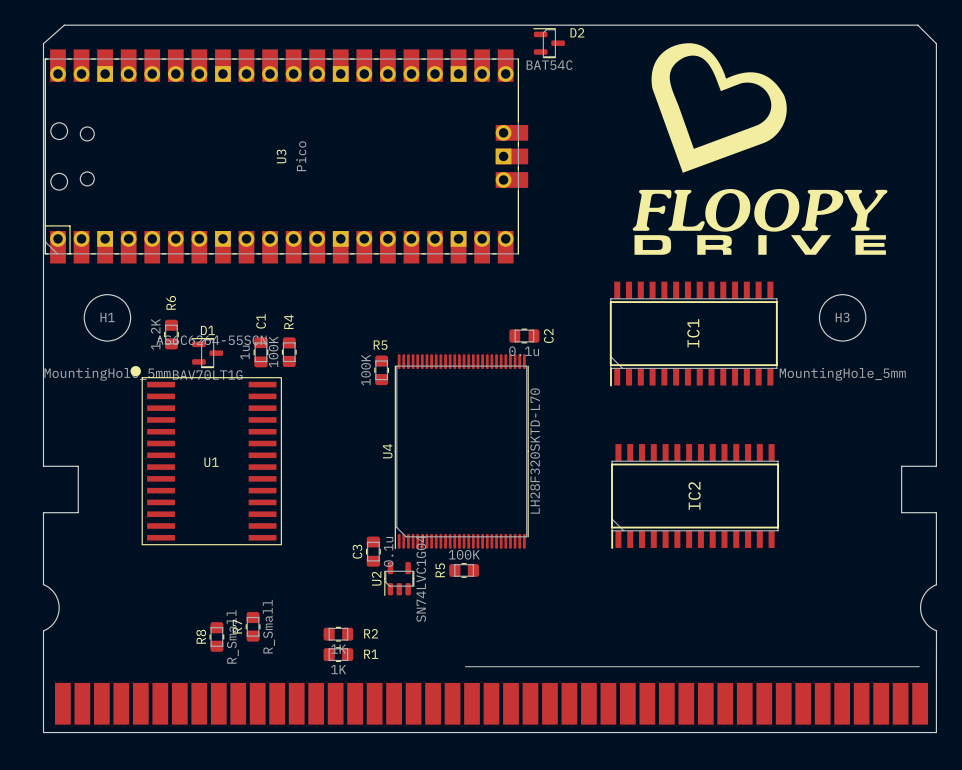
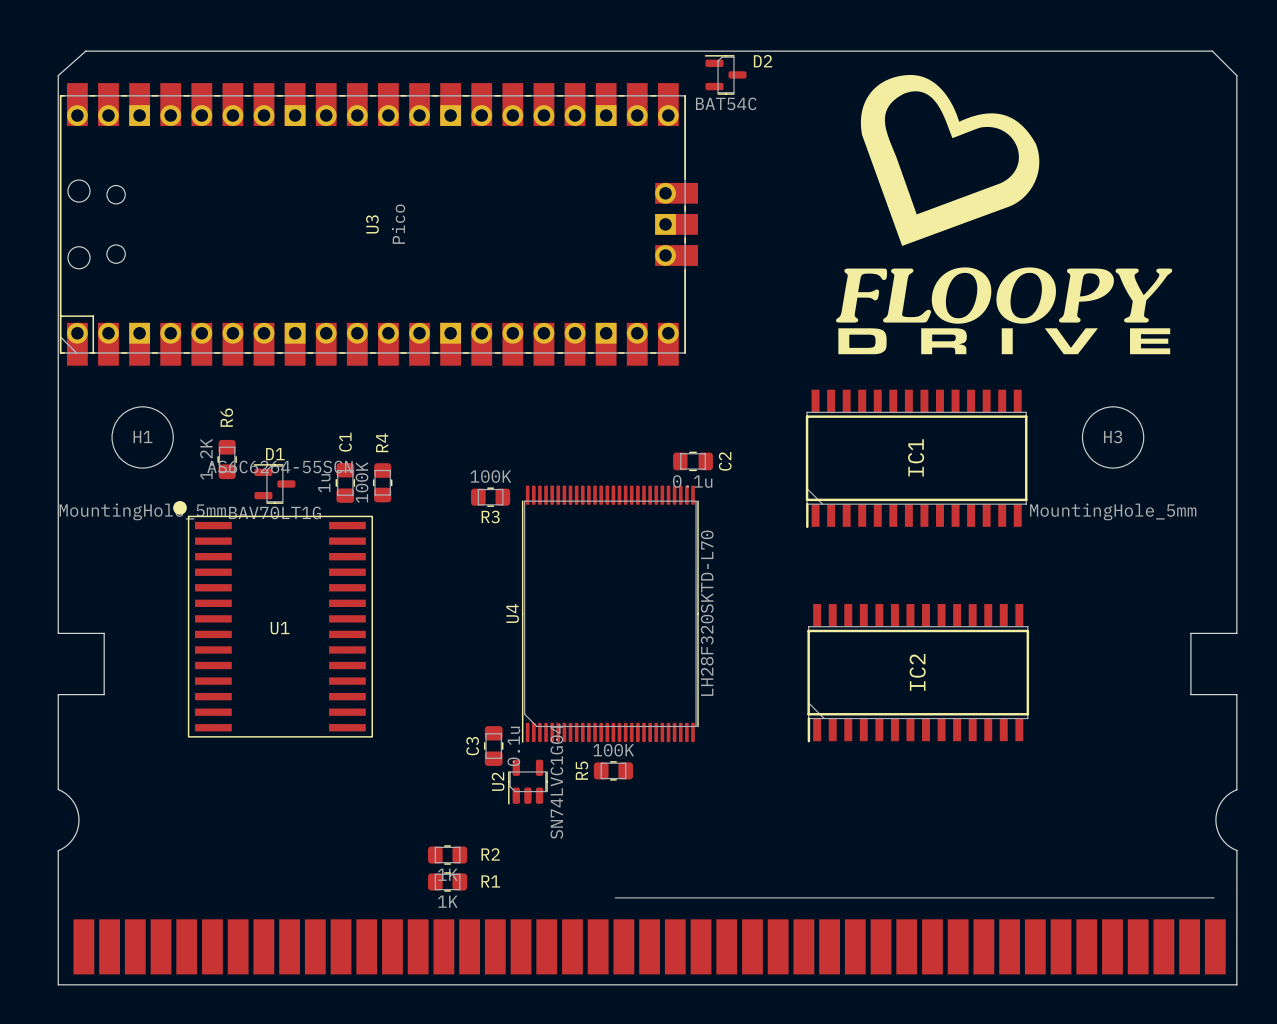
R3: none -> 100K (490, 497)
R5: 100K (381, 370) -> none
R7: R_Small (253, 626) -> none
R8: R_Small (216, 636) -> none

